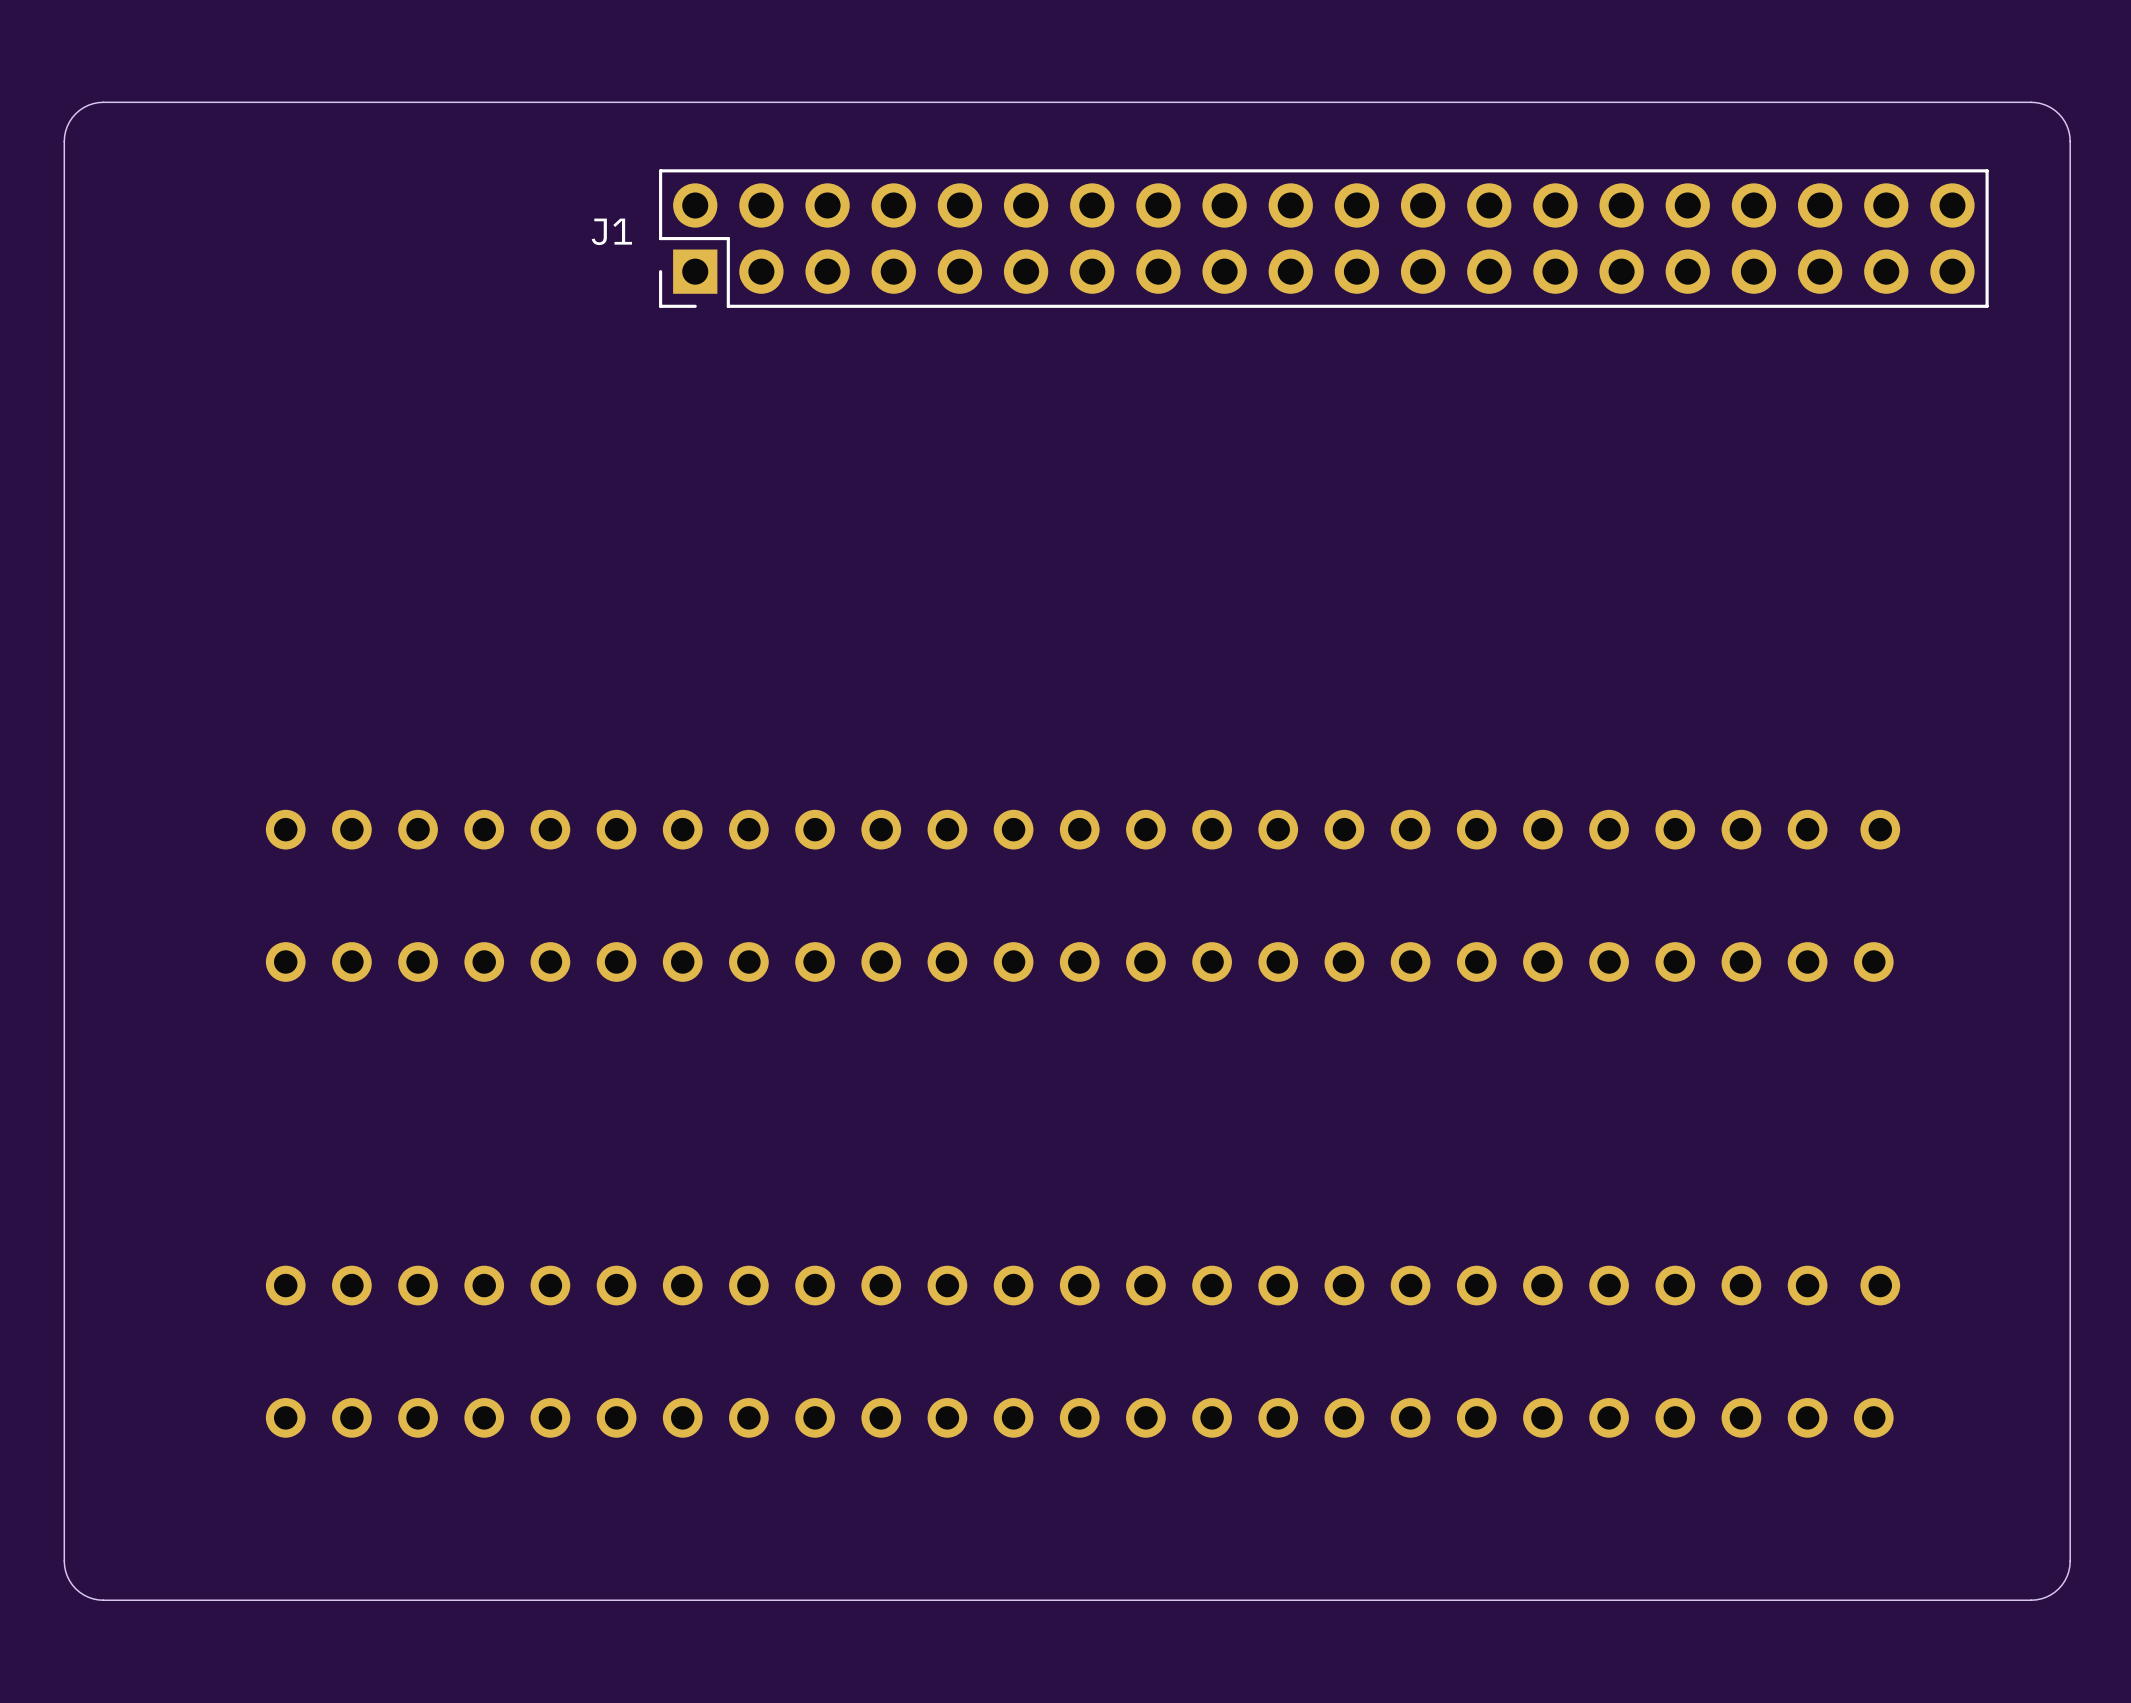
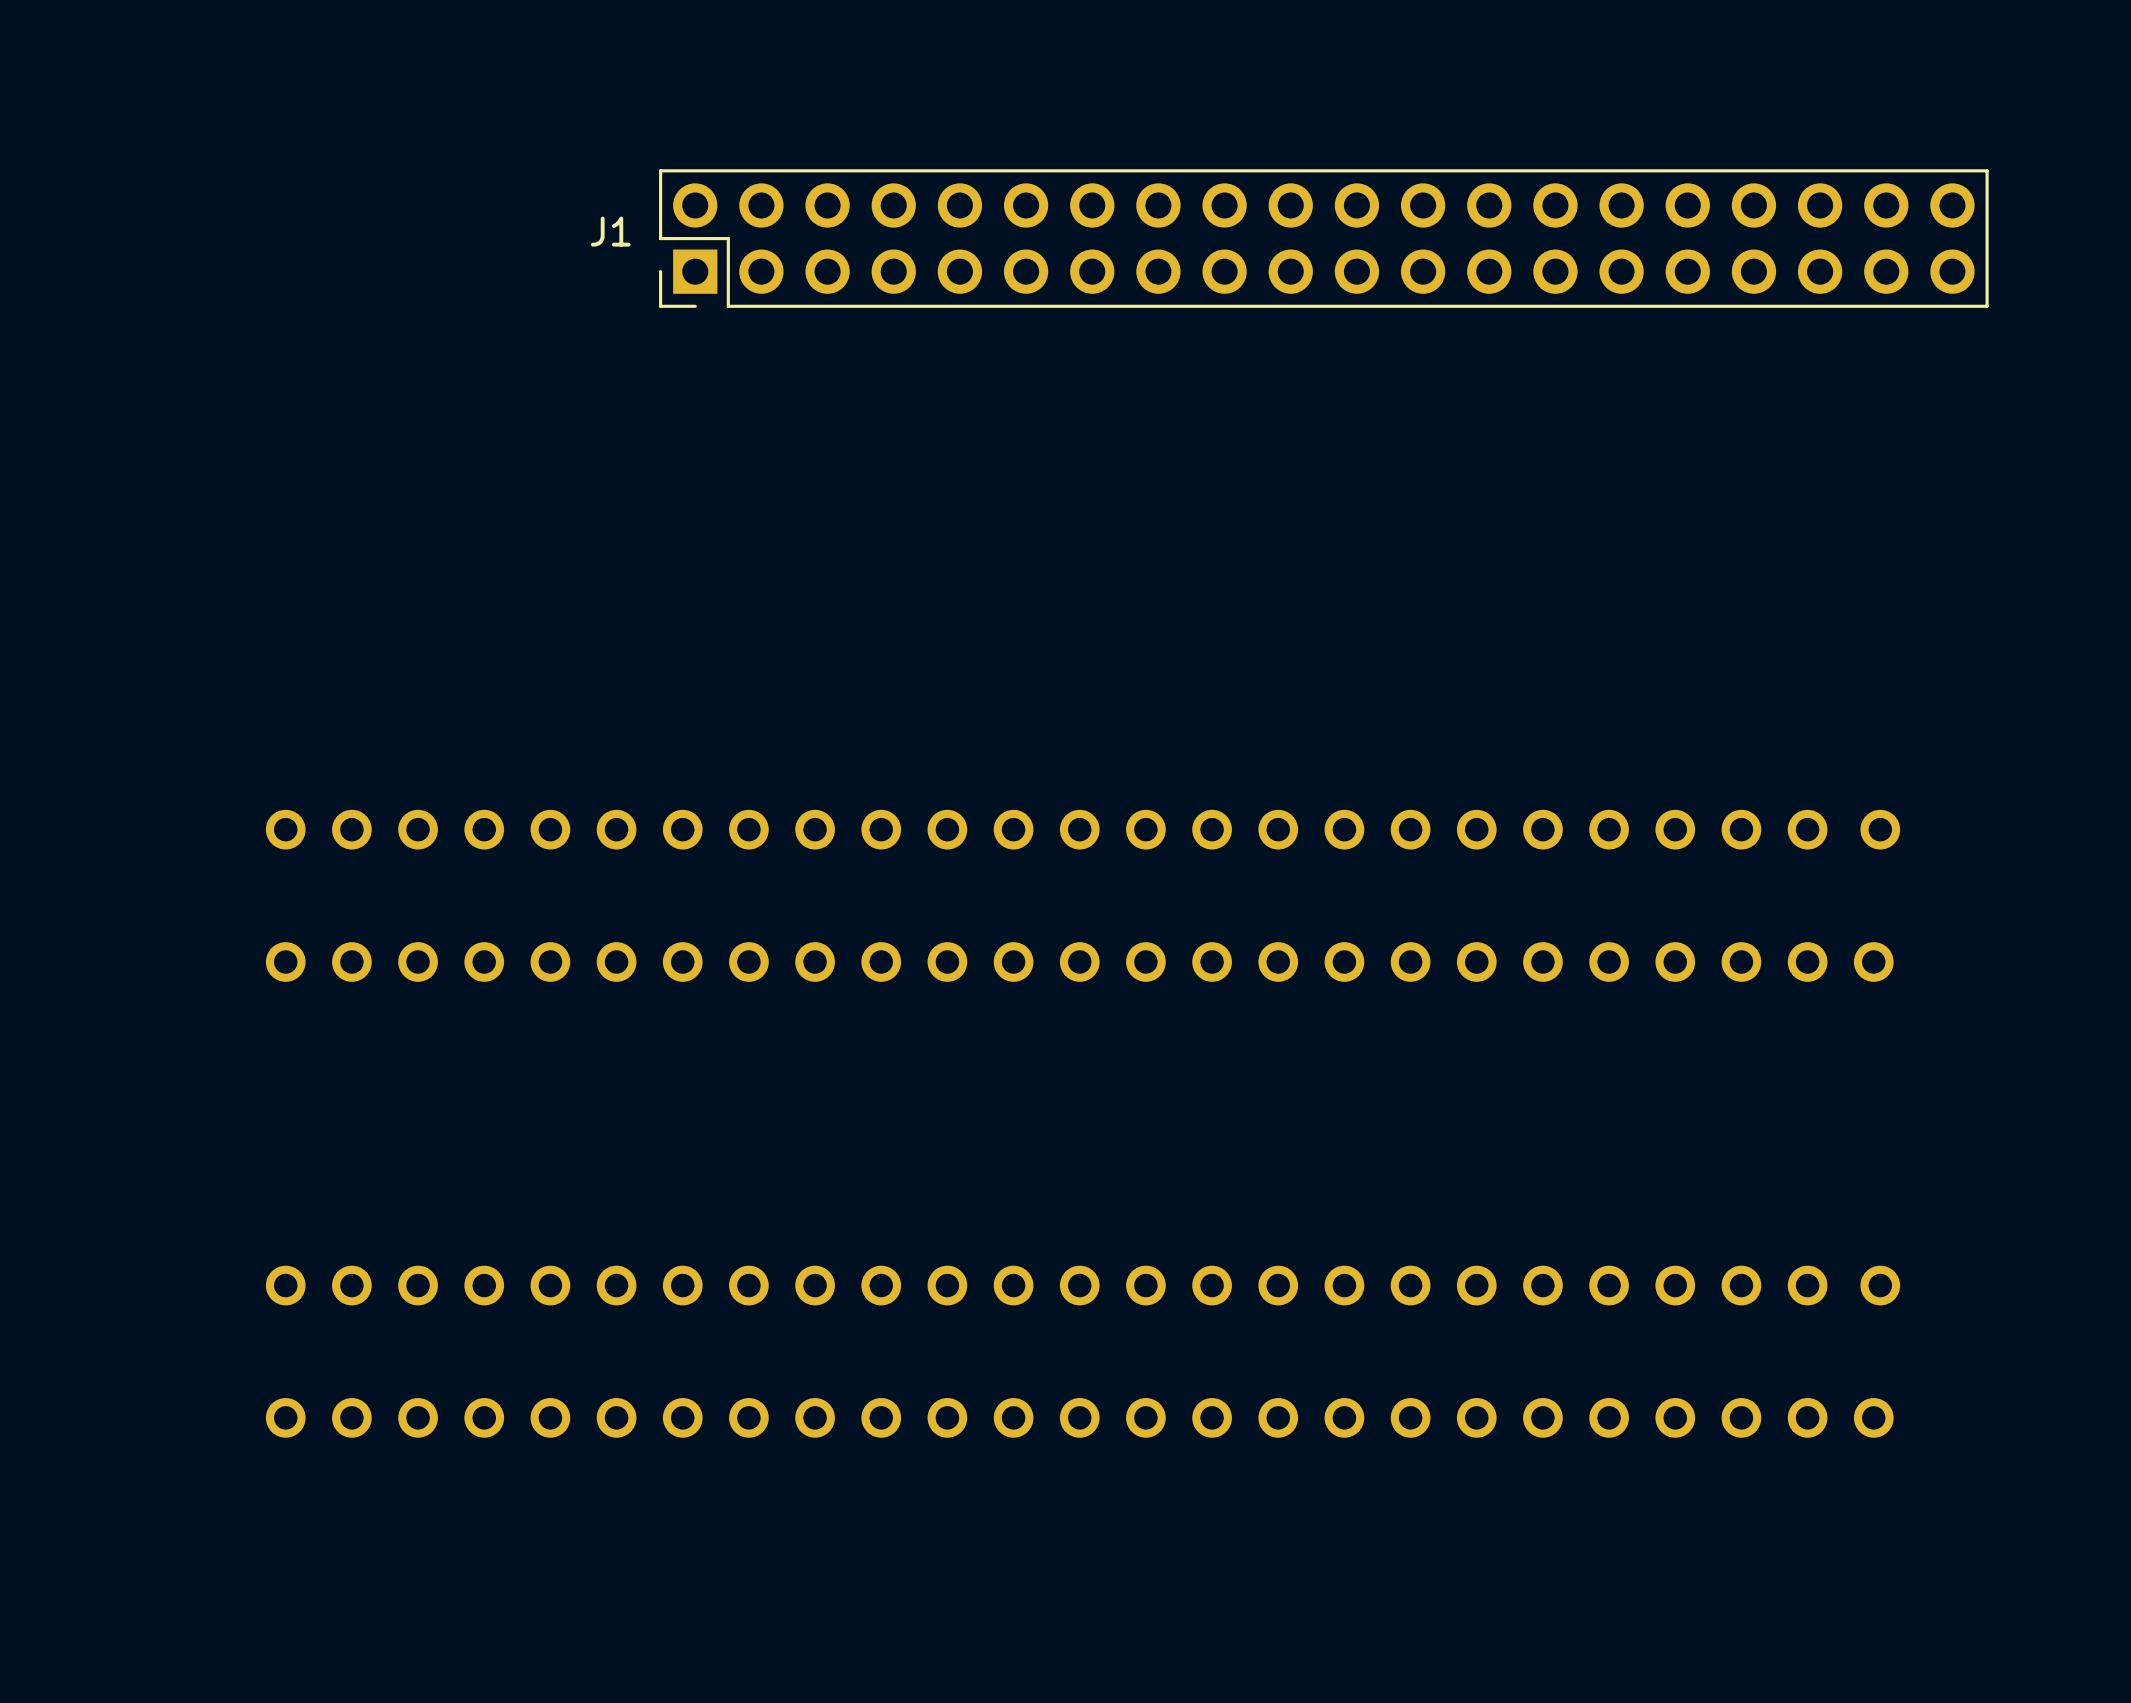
board edge: (2031, 102) (103, 102) (93, 103) (79, 110) (69, 121) (64, 141) (64, 1561) (67, 1576) (72, 1584) (88, 1597) (103, 1600) (2031, 1600) (2046, 1597) (2054, 1592) (2067, 1576) (2070, 1561) (2070, 141) (2067, 126) (2058, 113) (2046, 105) (2031, 102) -> none

